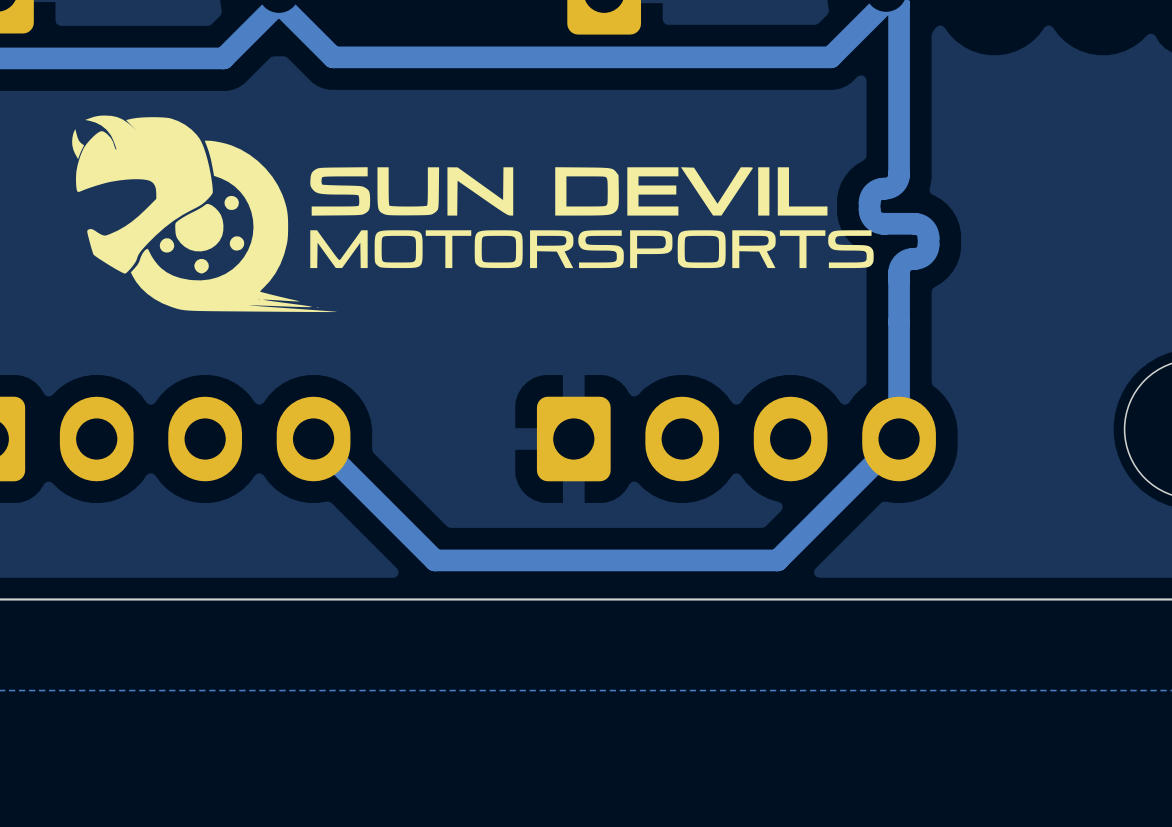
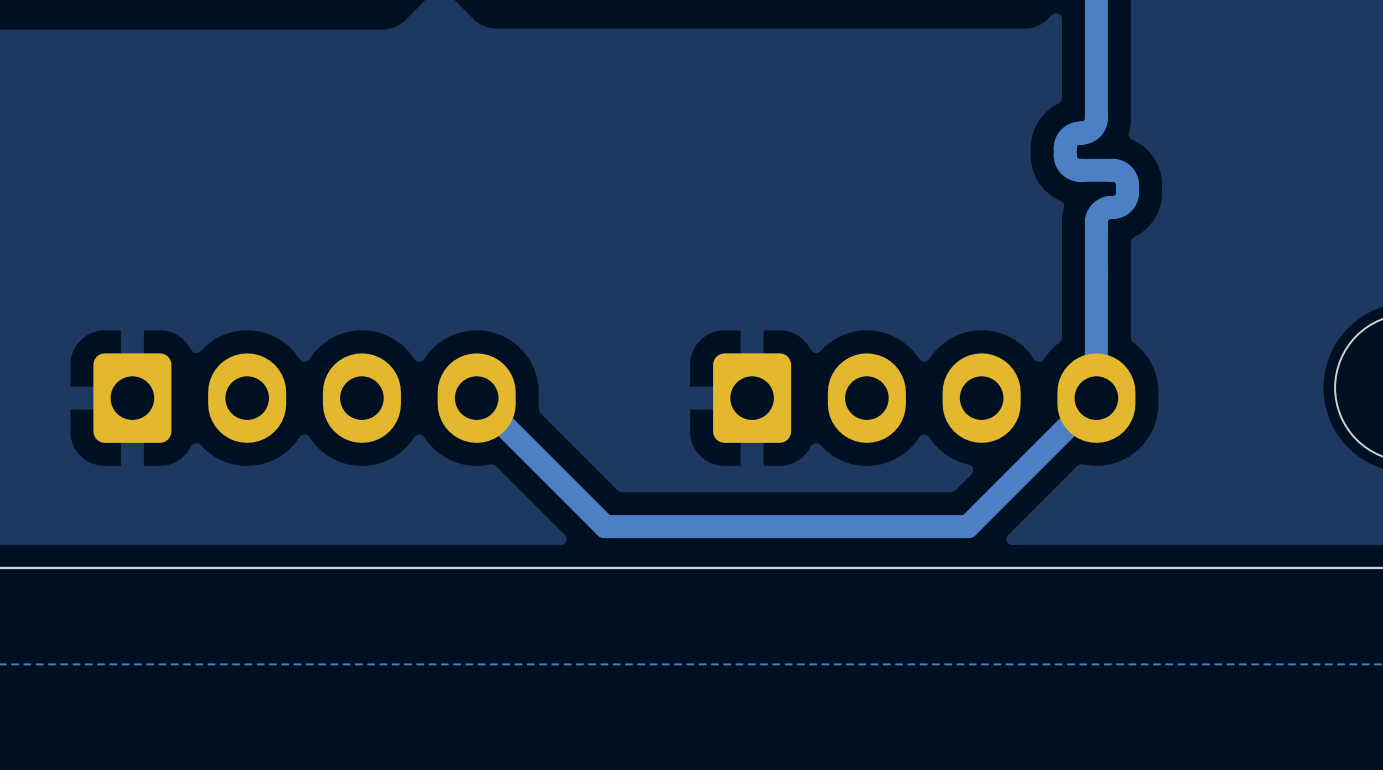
drawing: [72, 115, 874, 313] -> none

